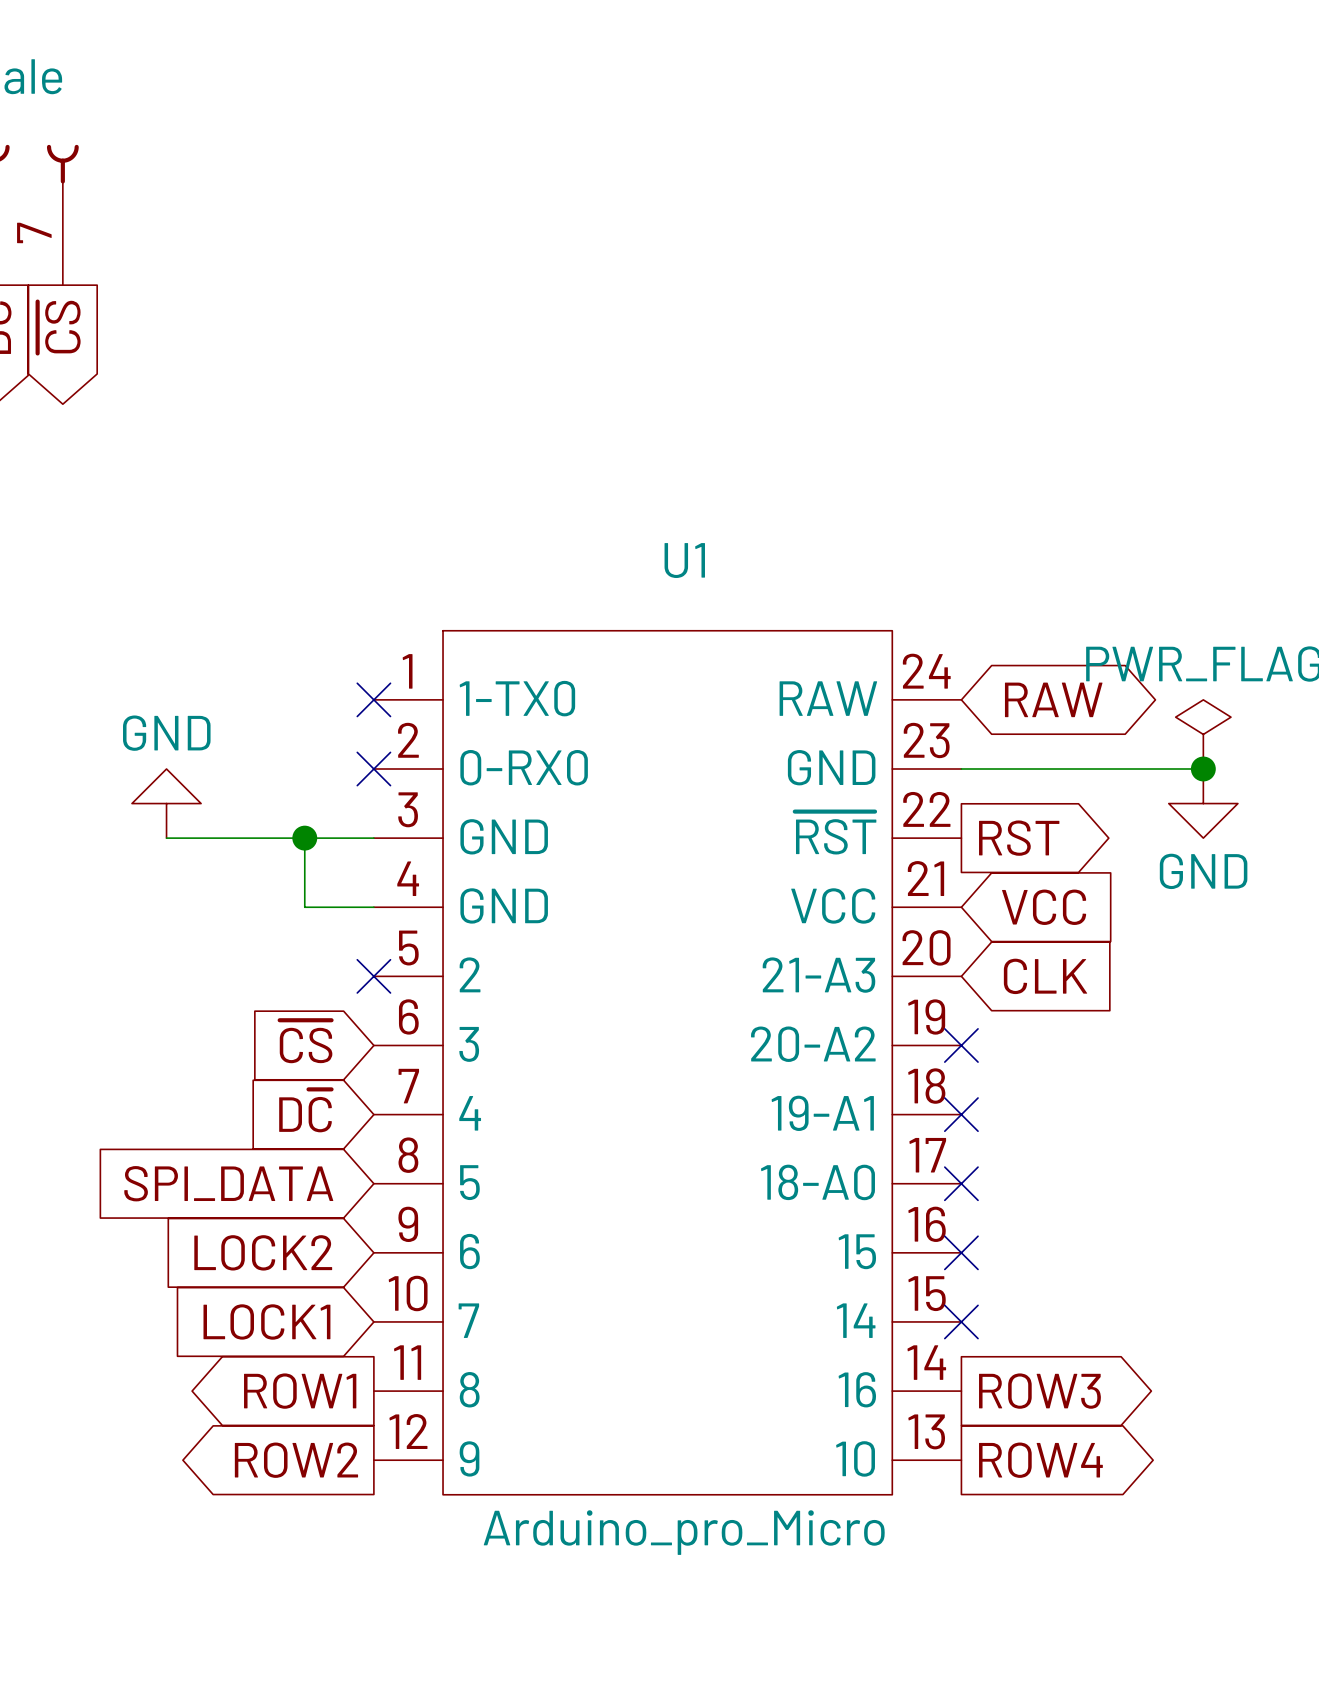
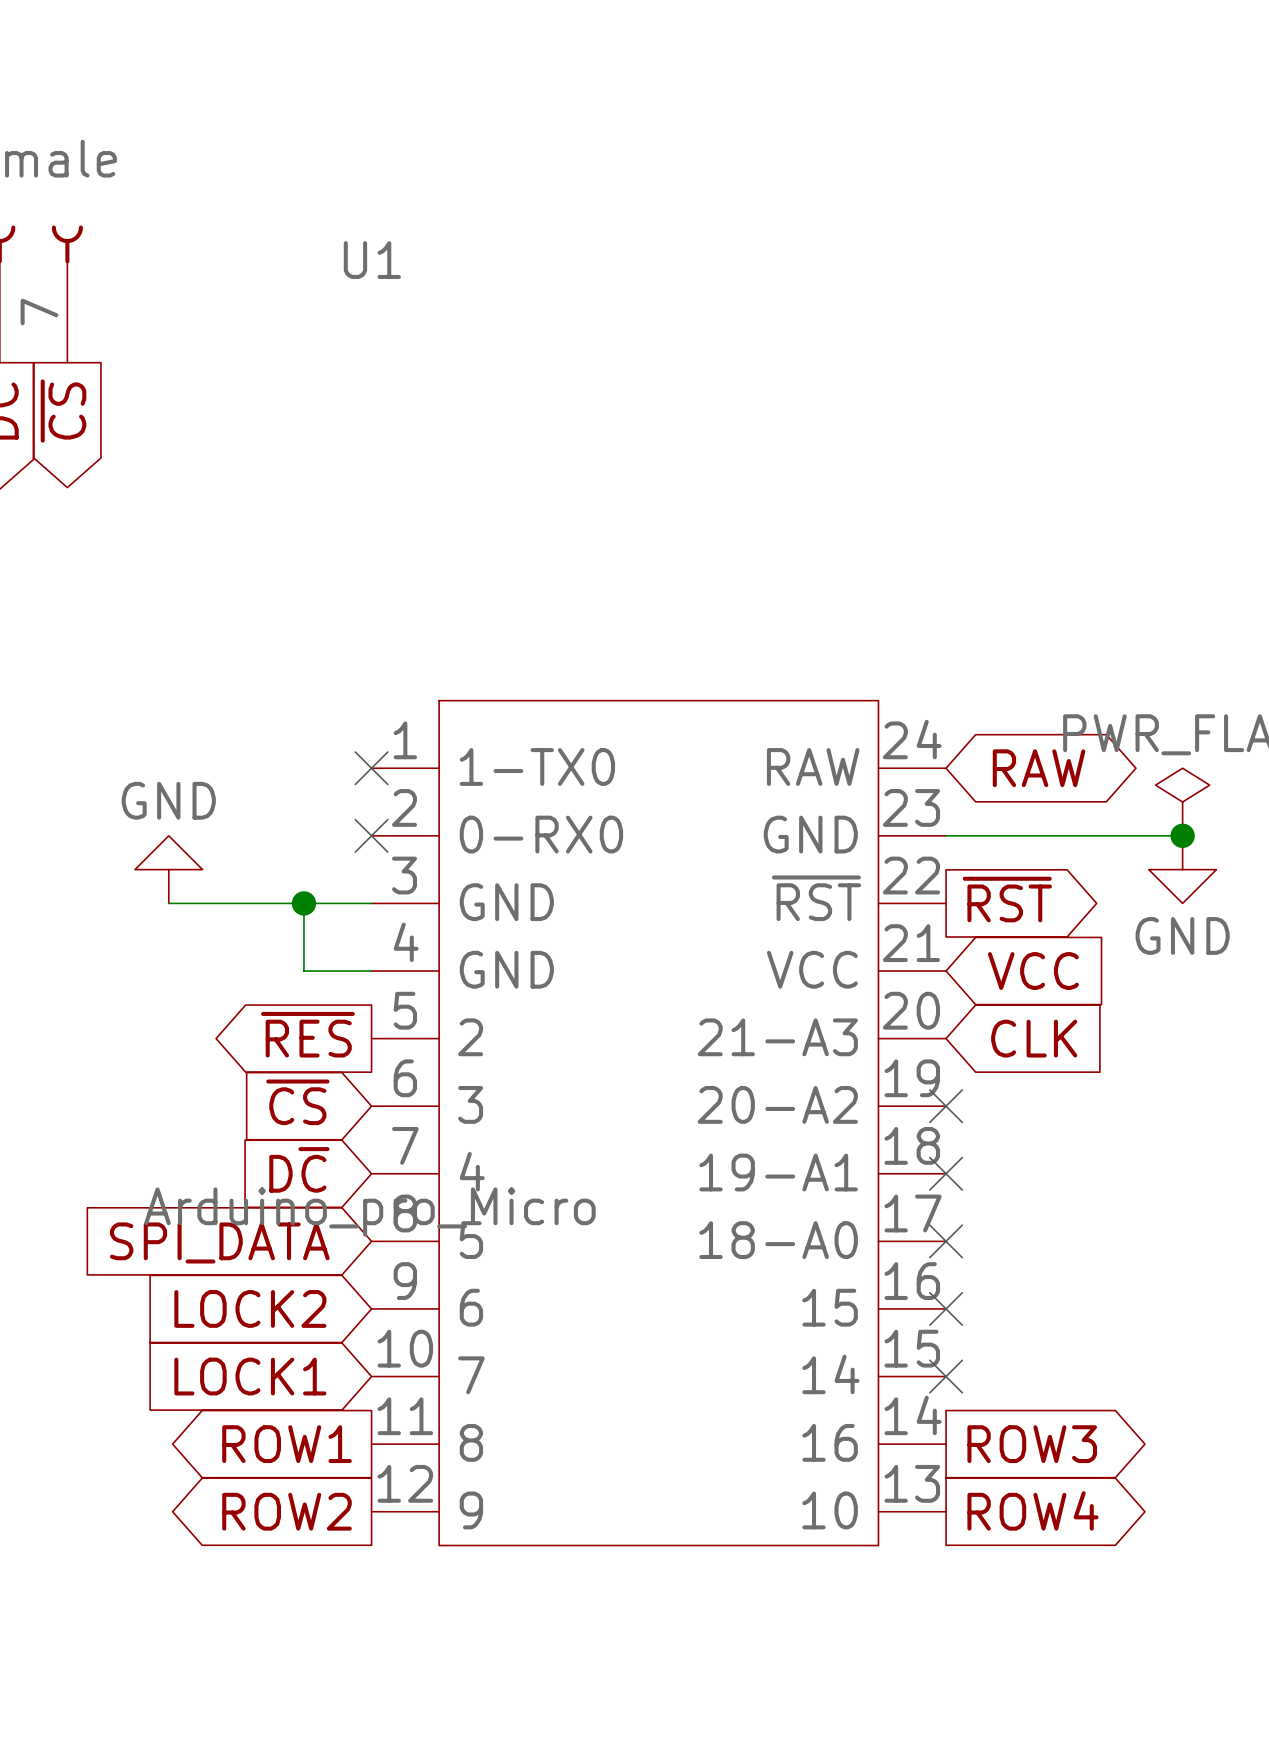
U1 name position: U1 (684, 560) -> U1 (372, 260)
global label: RST (1019, 838) -> ~{RST} (1007, 899)
global label: none -> ~{RES} (307, 1034)
no-connect mark: (373, 976) -> none
U1 value position: Arduino_pro_Micro (684, 1532) -> Arduino_pro_Micro (369, 1211)

